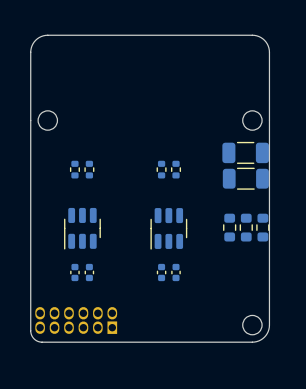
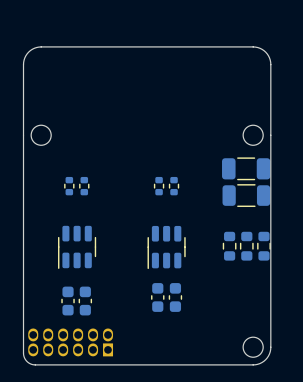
part footprint: [70, 263, 80, 282] -> [61, 286, 75, 316]
part footprint: [84, 263, 95, 282] -> [78, 286, 93, 316]
part footprint: [156, 263, 167, 282] -> [151, 283, 165, 312]
part footprint: [171, 263, 181, 282] -> [168, 283, 183, 312]

